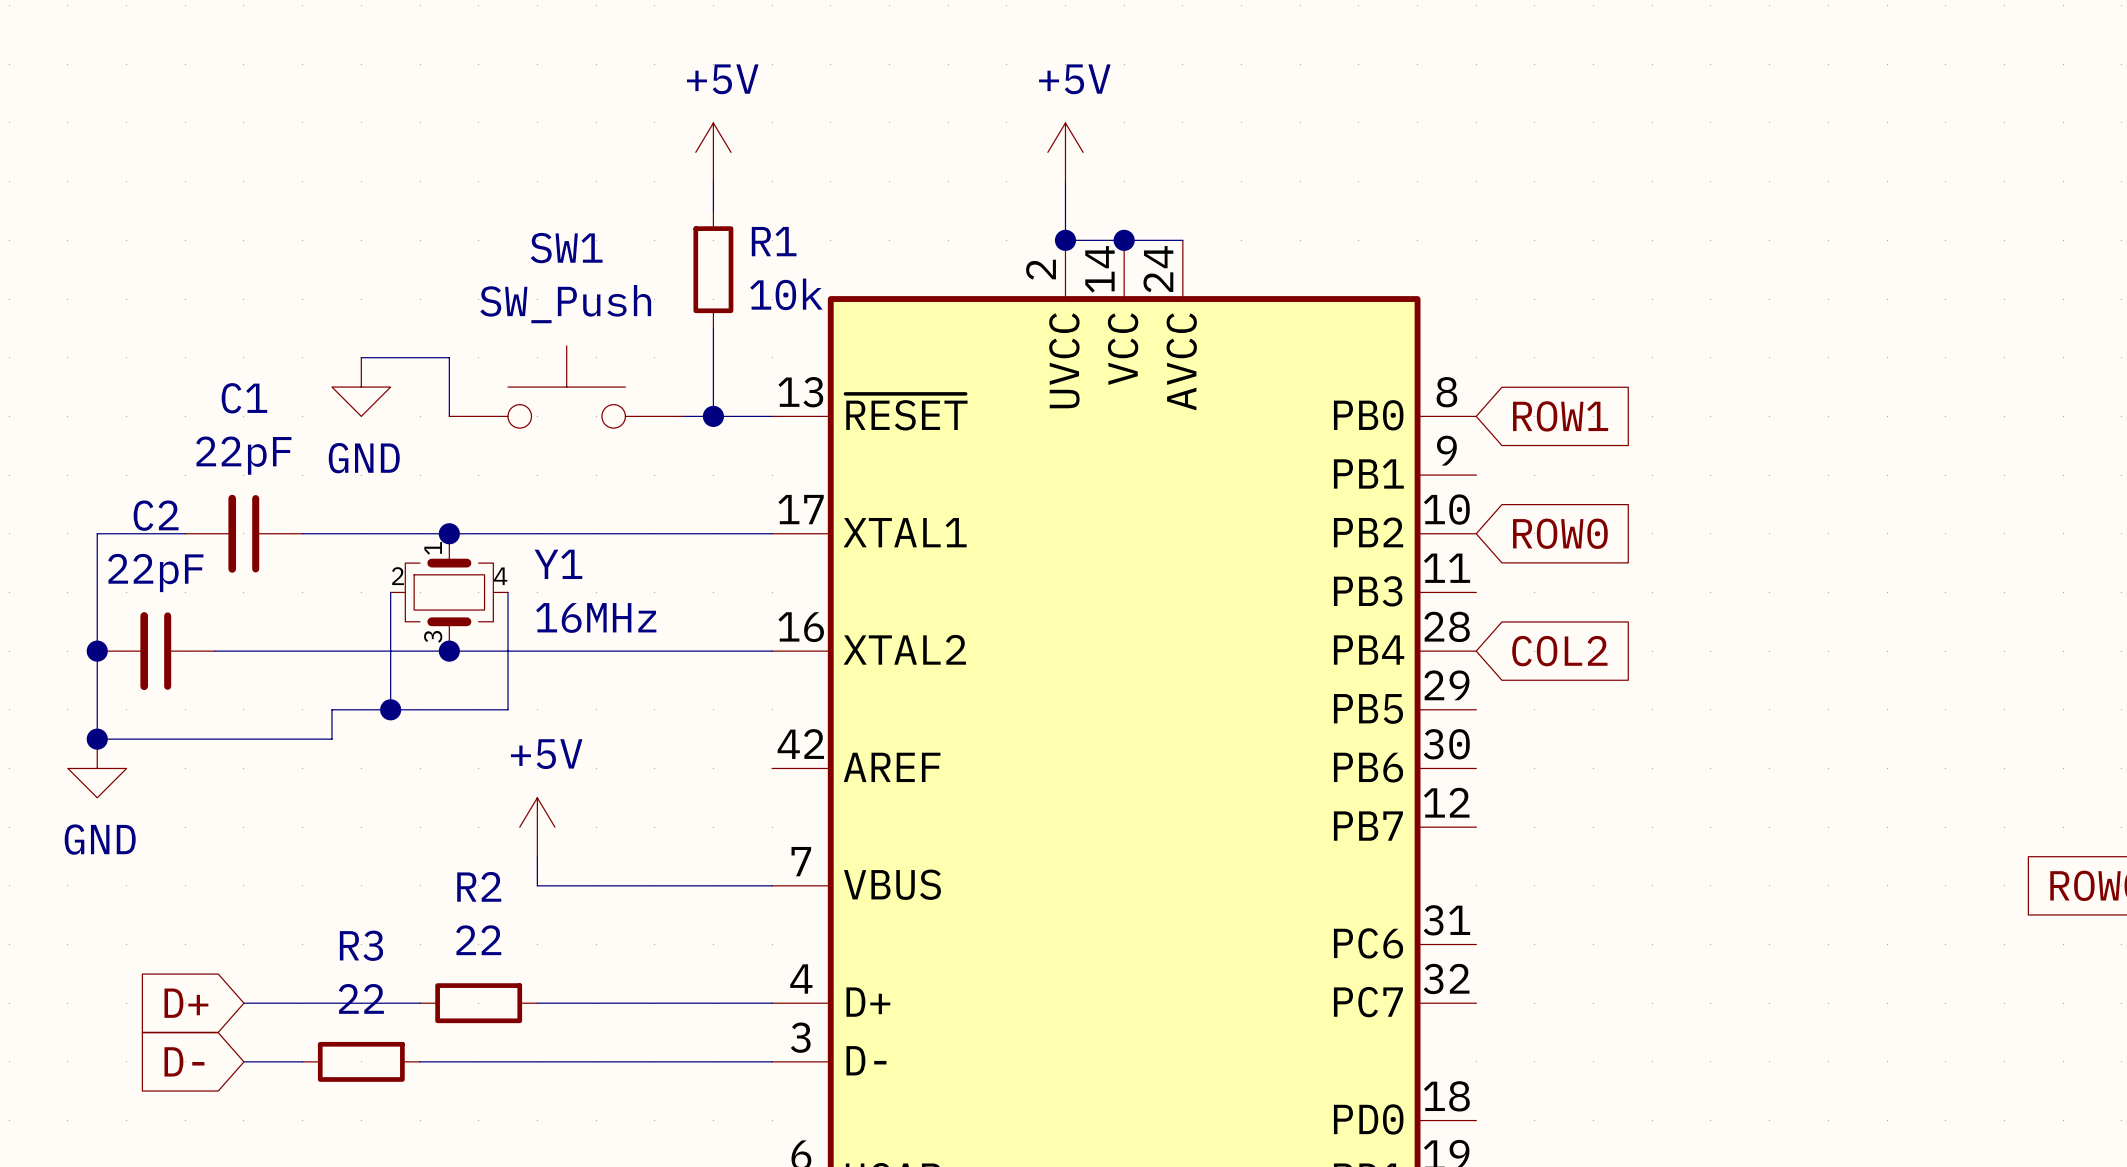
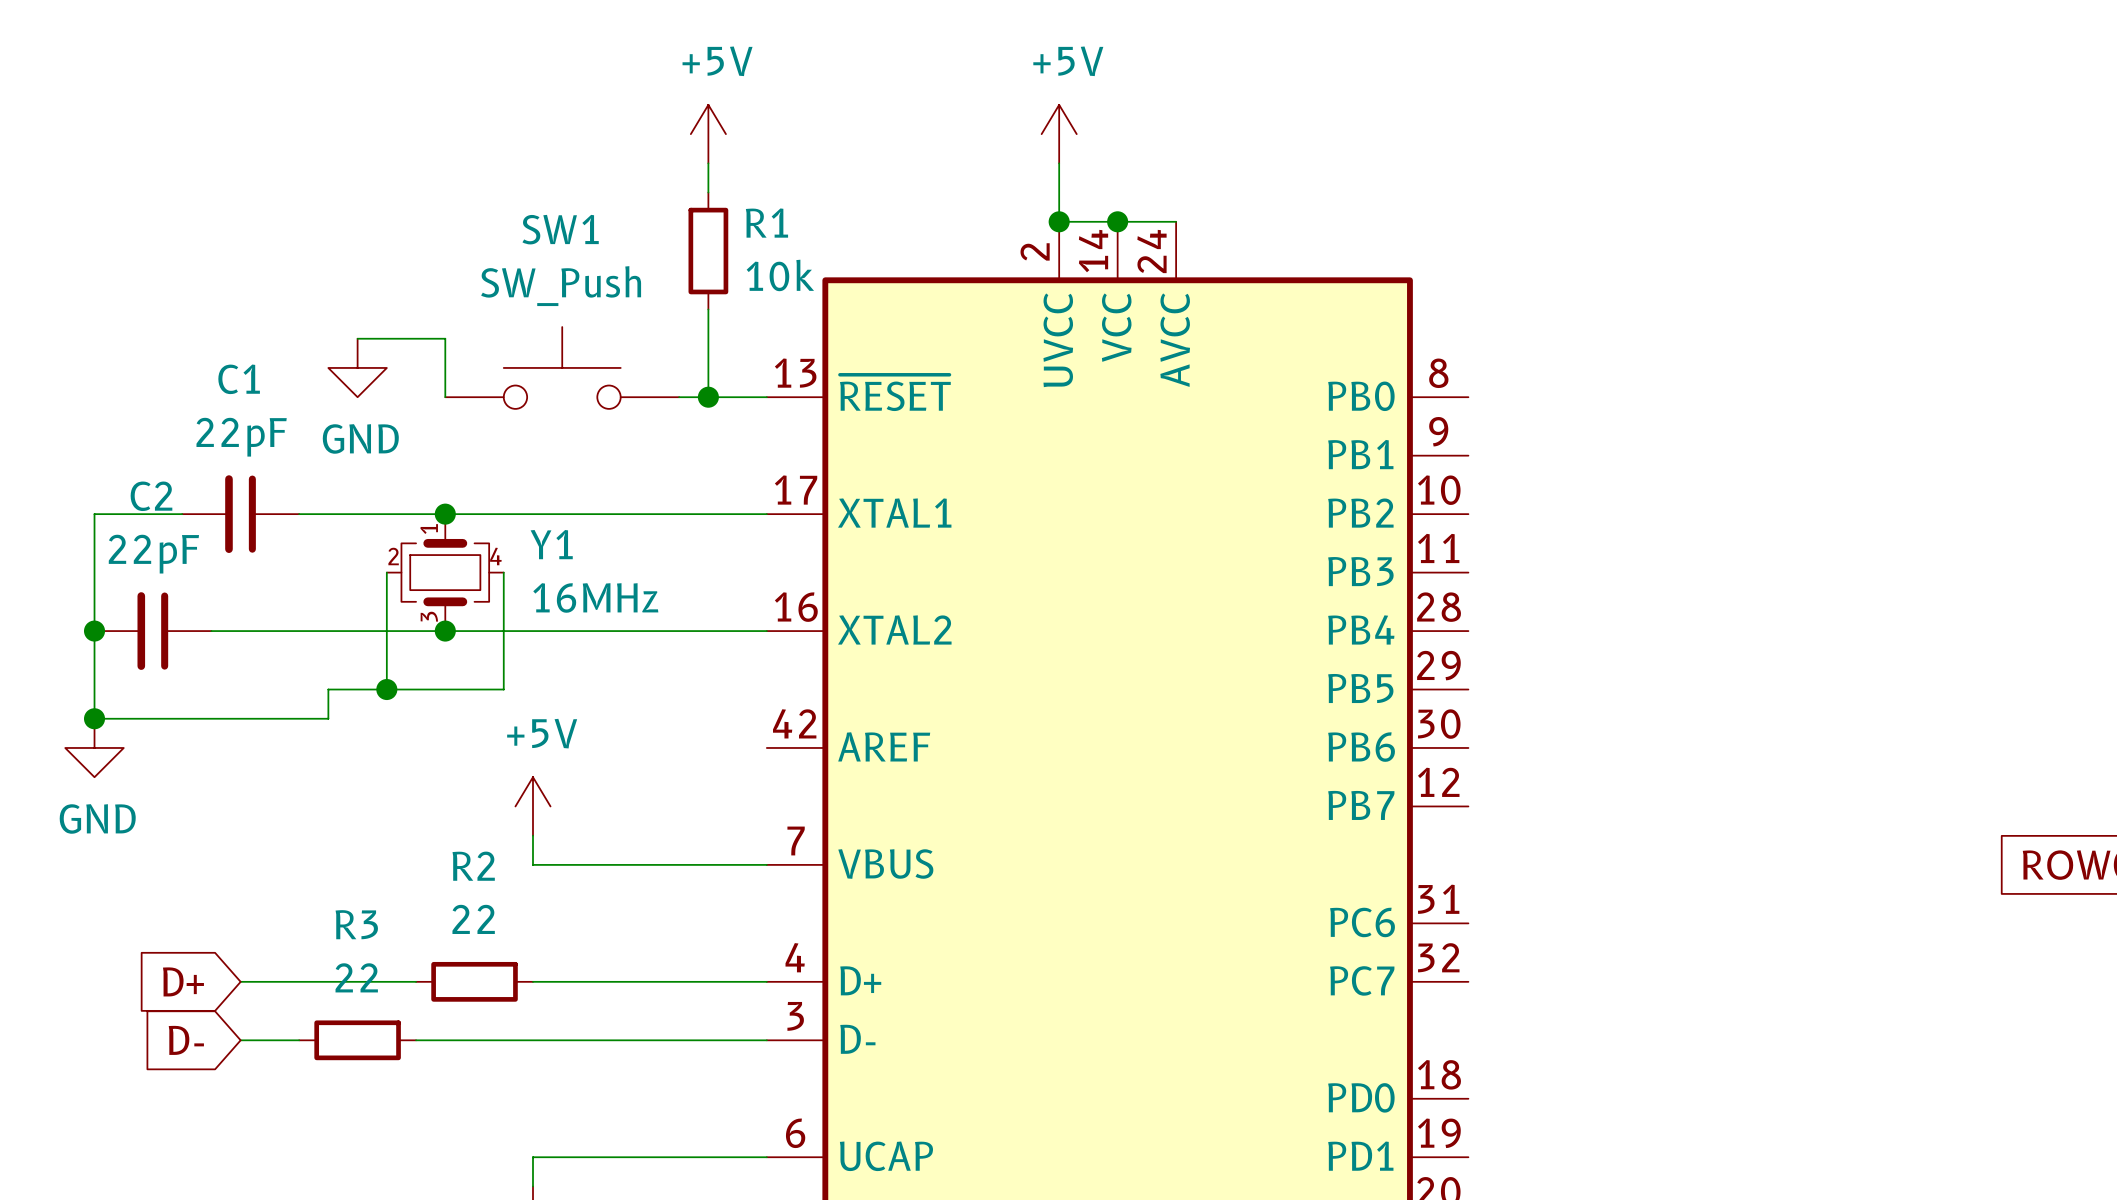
global label: ROW1 (1560, 416) -> none
global label: ROW0 (1560, 533) -> none
global label: COL2 (1559, 651) -> none

